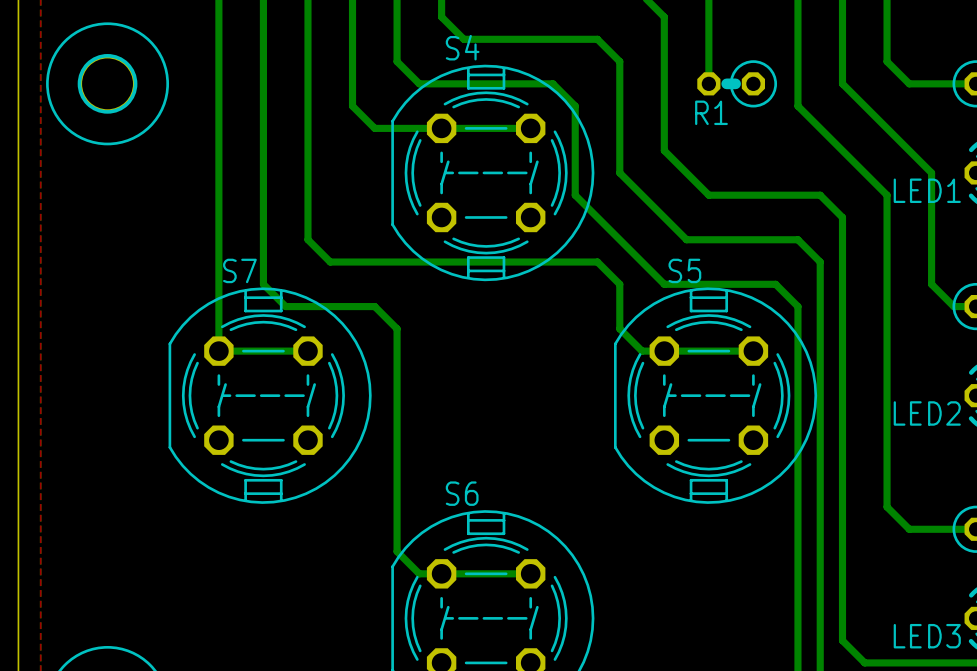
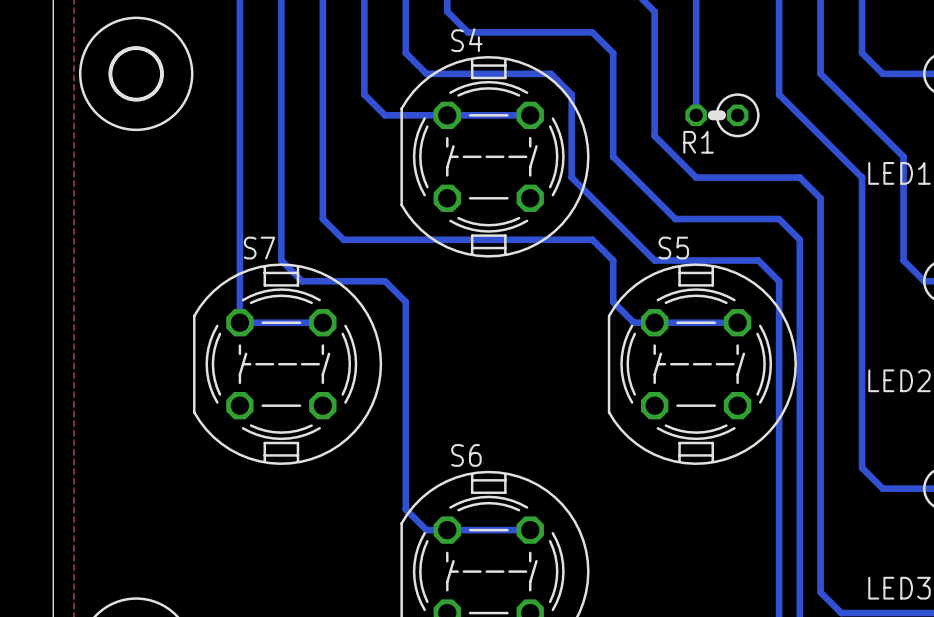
bottom track: none -> (696, 73) (696, 115)
R1 position: (737, 83) -> (722, 115)

